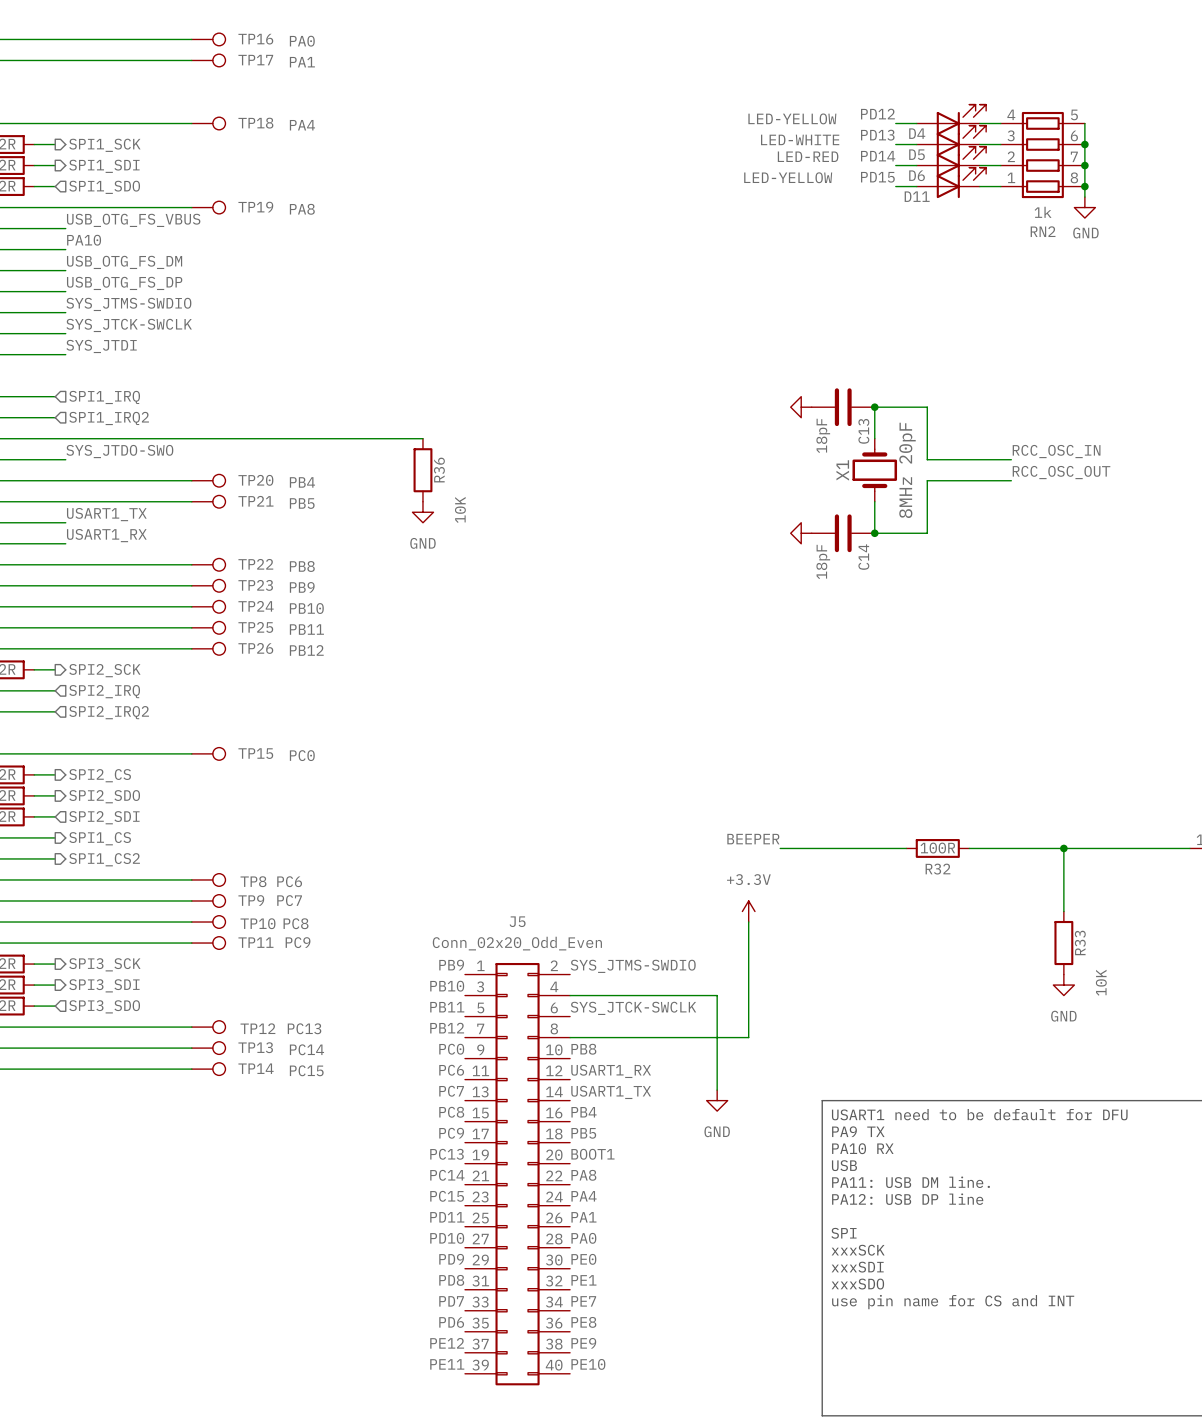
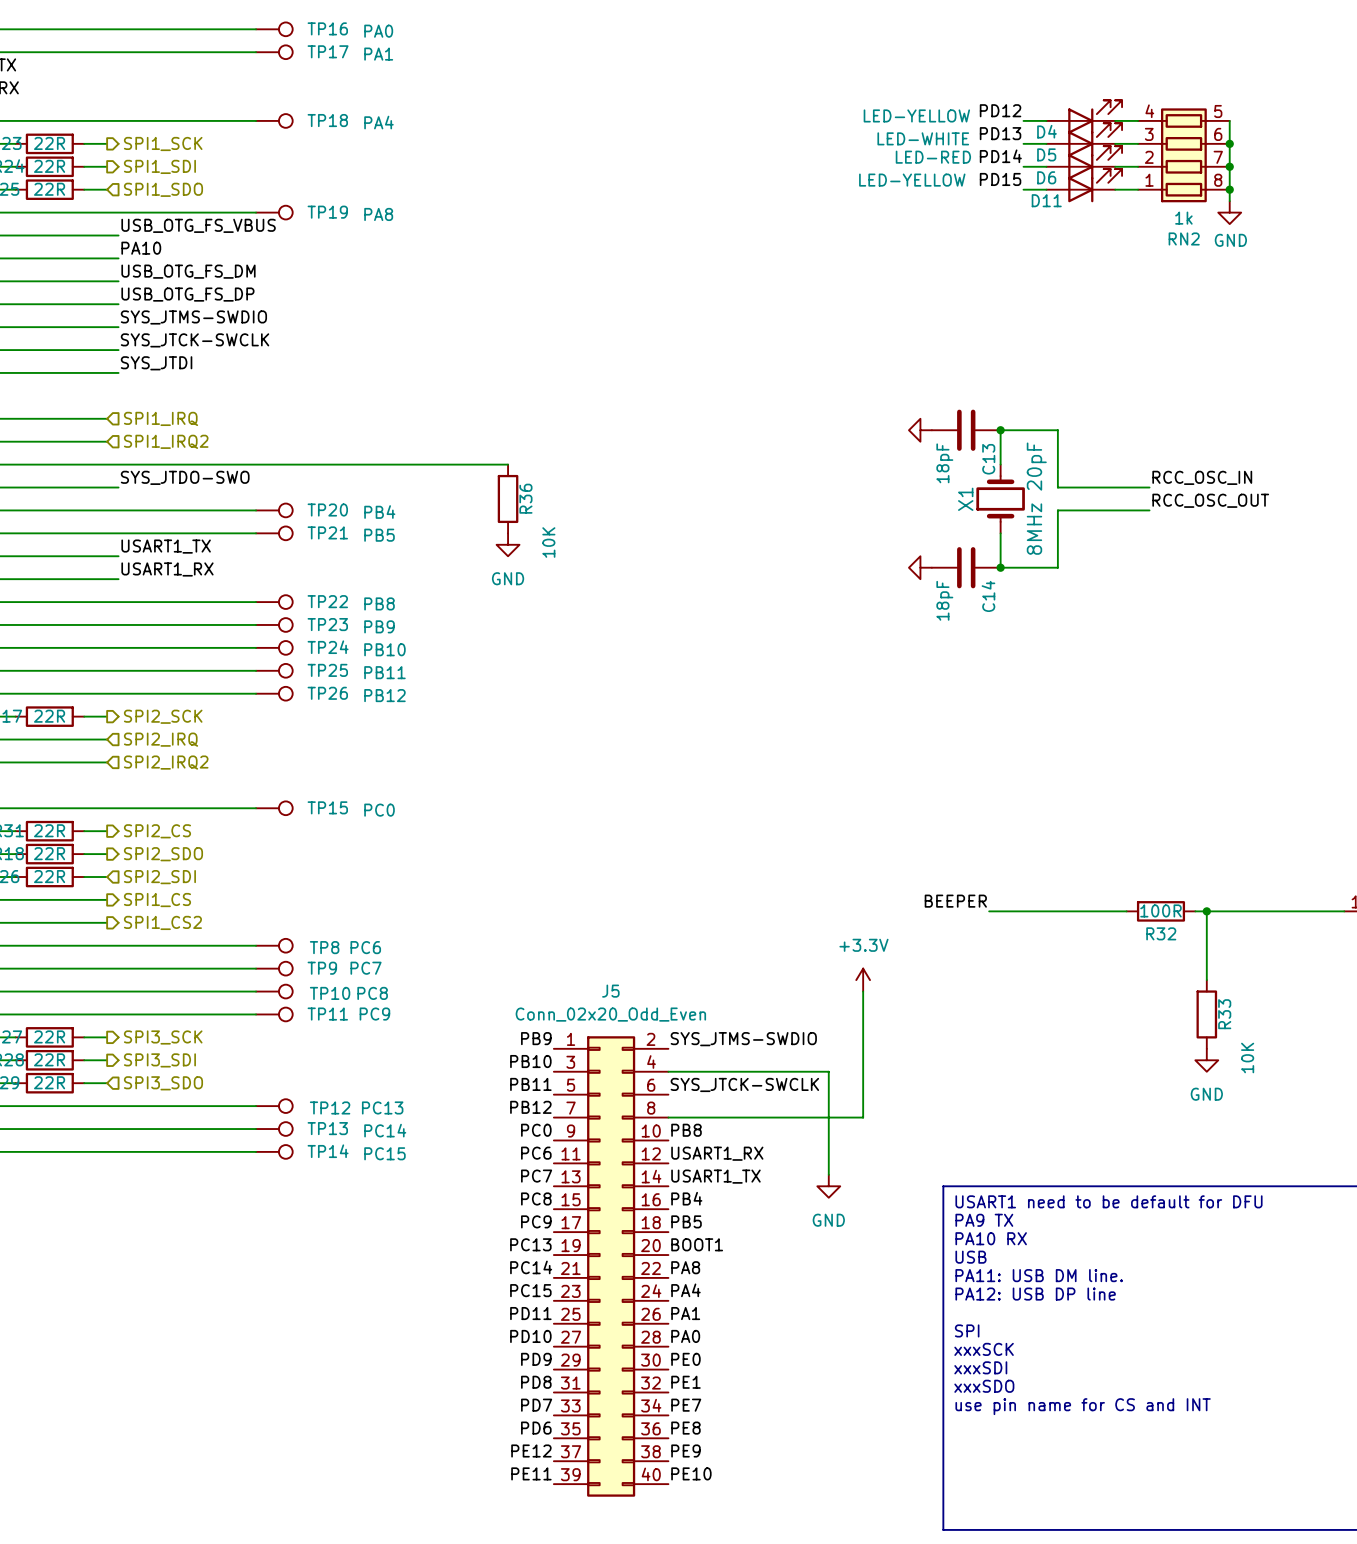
label position: BEEPER (753, 839) -> BEEPER (955, 901)
wire: (780, 848) (864, 848) -> none
R32 position: (937, 848) -> (1160, 911)

